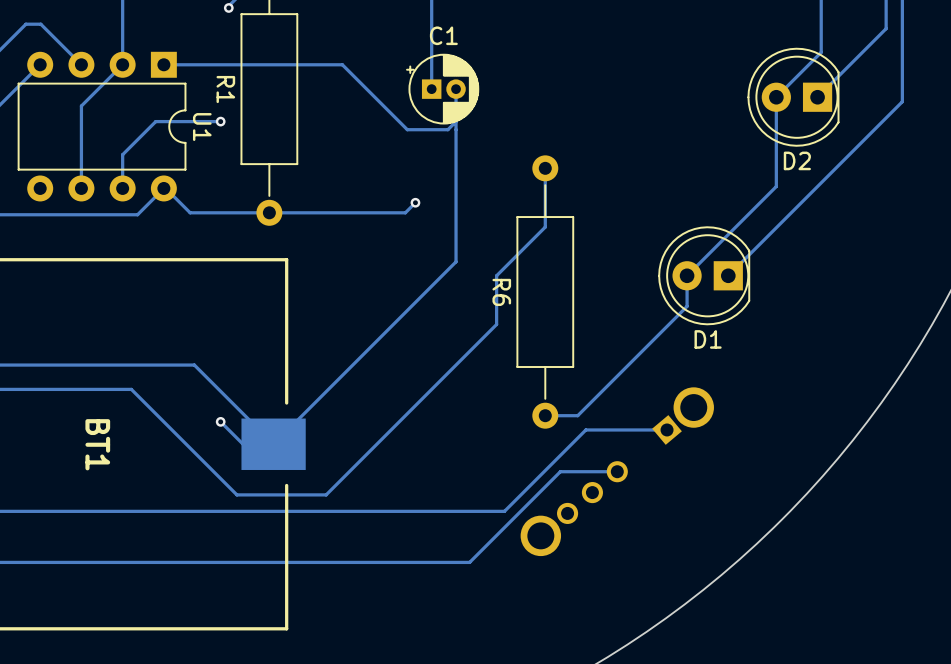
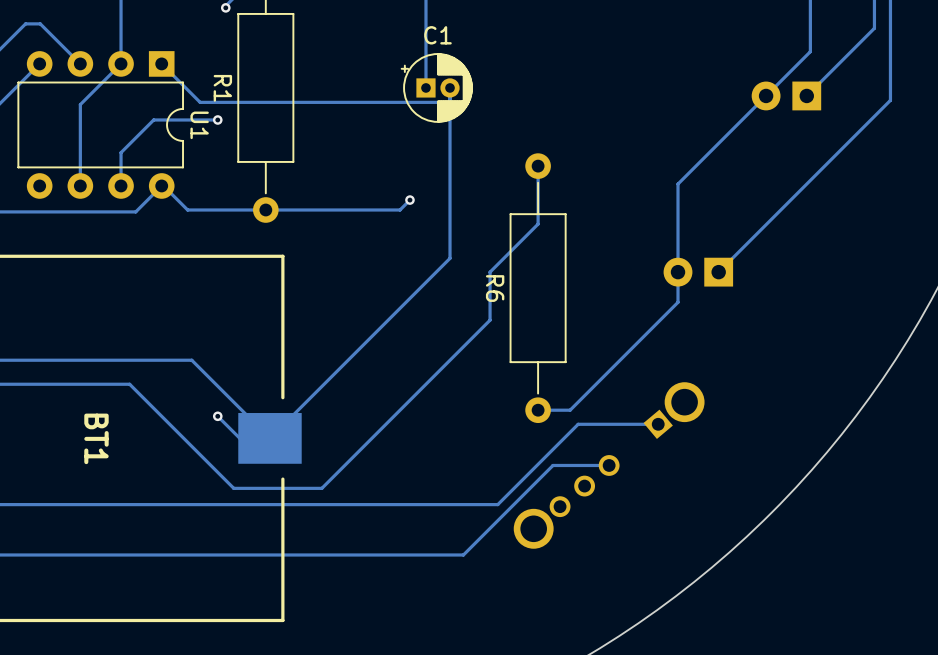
track: (163, 64) (342, 64) (407, 129) (447, 129) (456, 121) -> (161, 63) (200, 102) (450, 101)
track: (776, 97) (776, 186) (687, 275) -> (766, 95) (678, 184) (678, 272)
D2 side: bottom (793, 97) -> top (786, 95)
D1 side: bottom (704, 275) -> top (698, 272)

